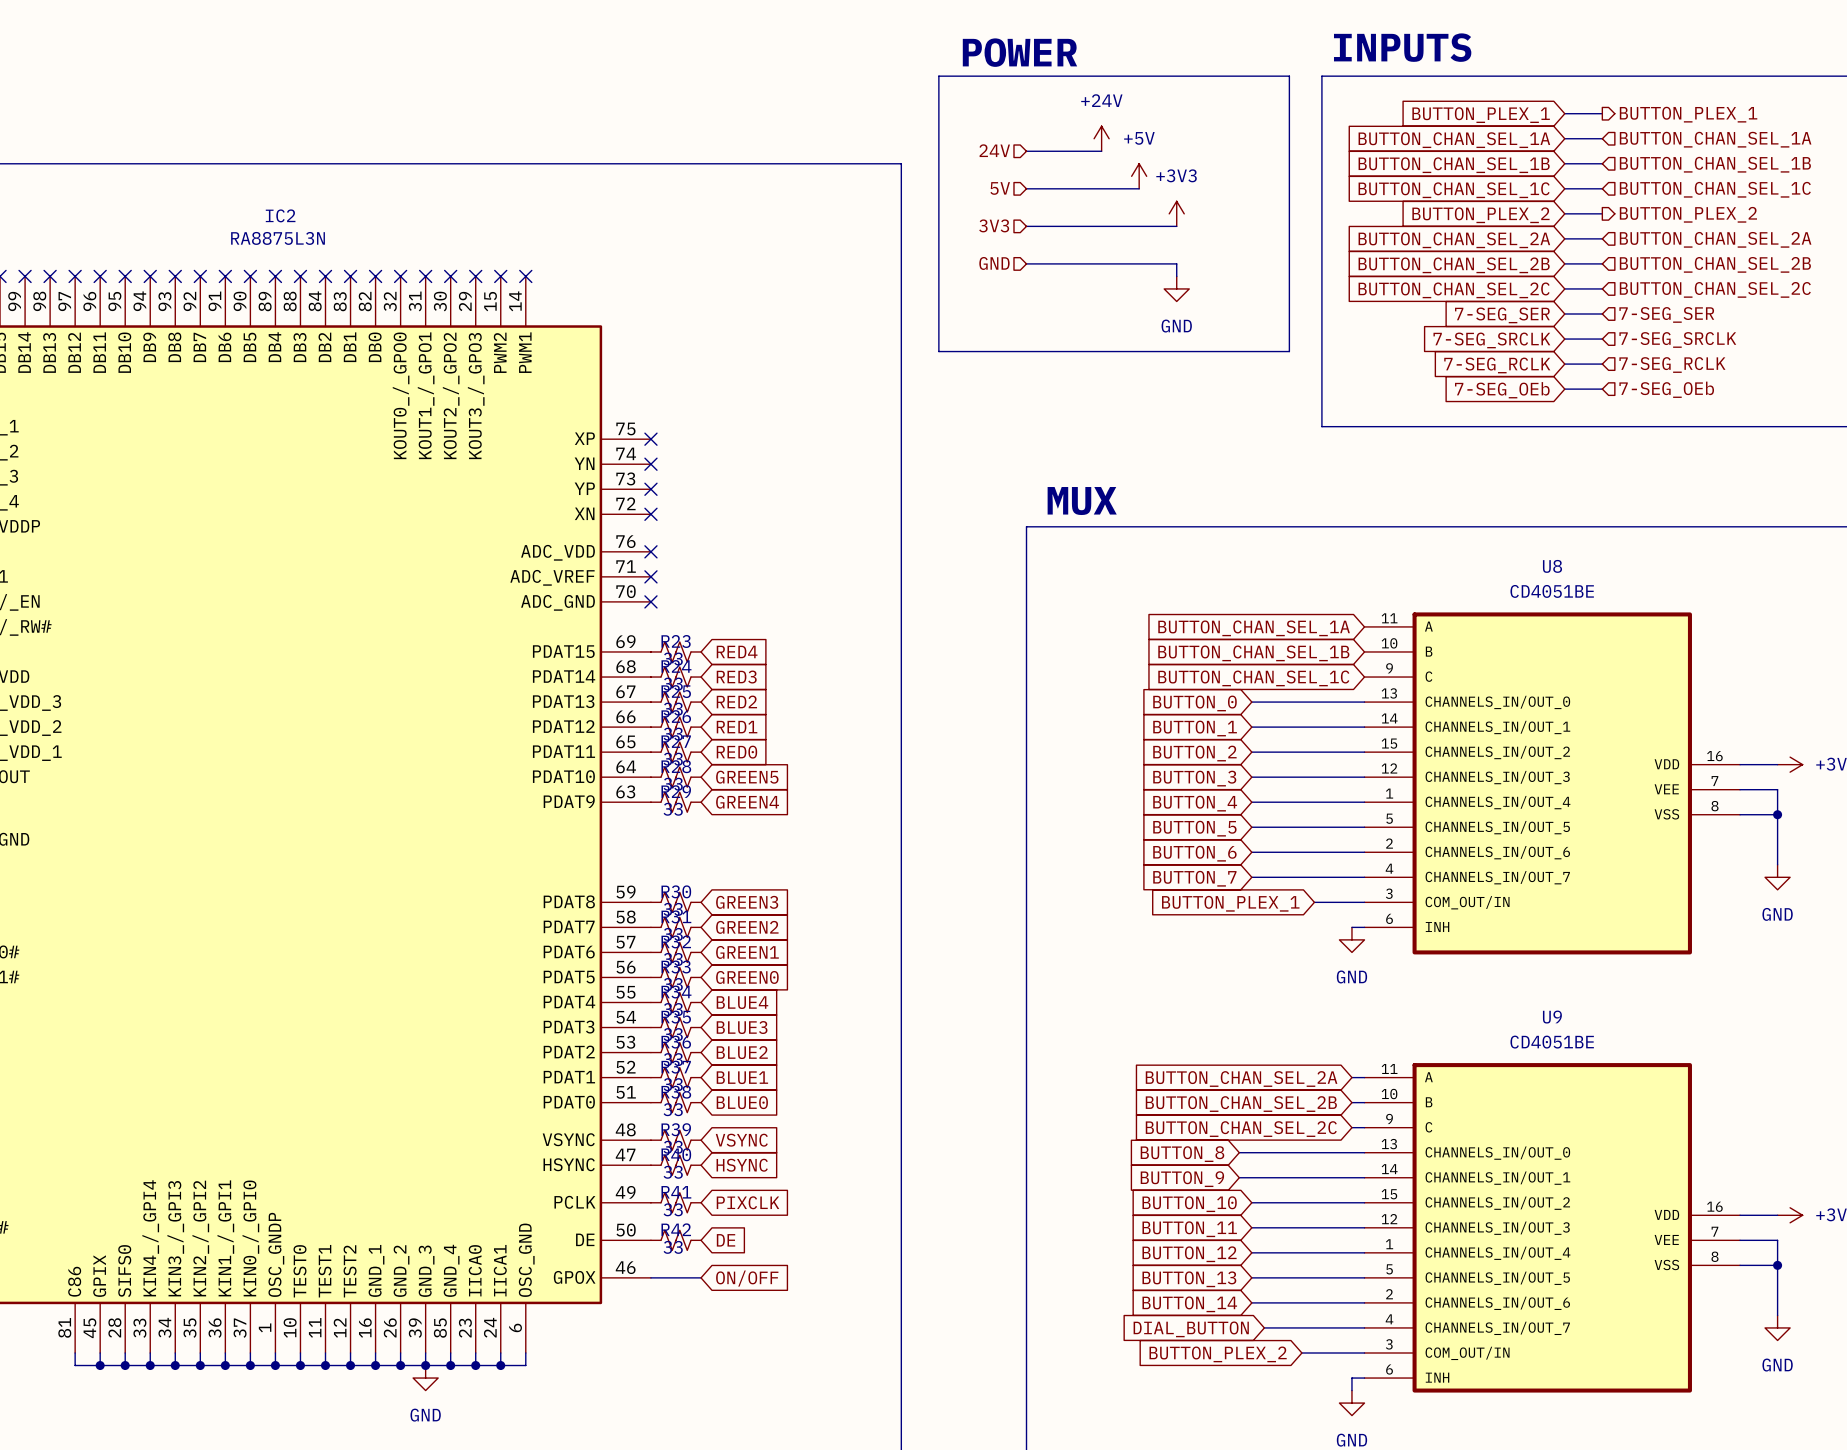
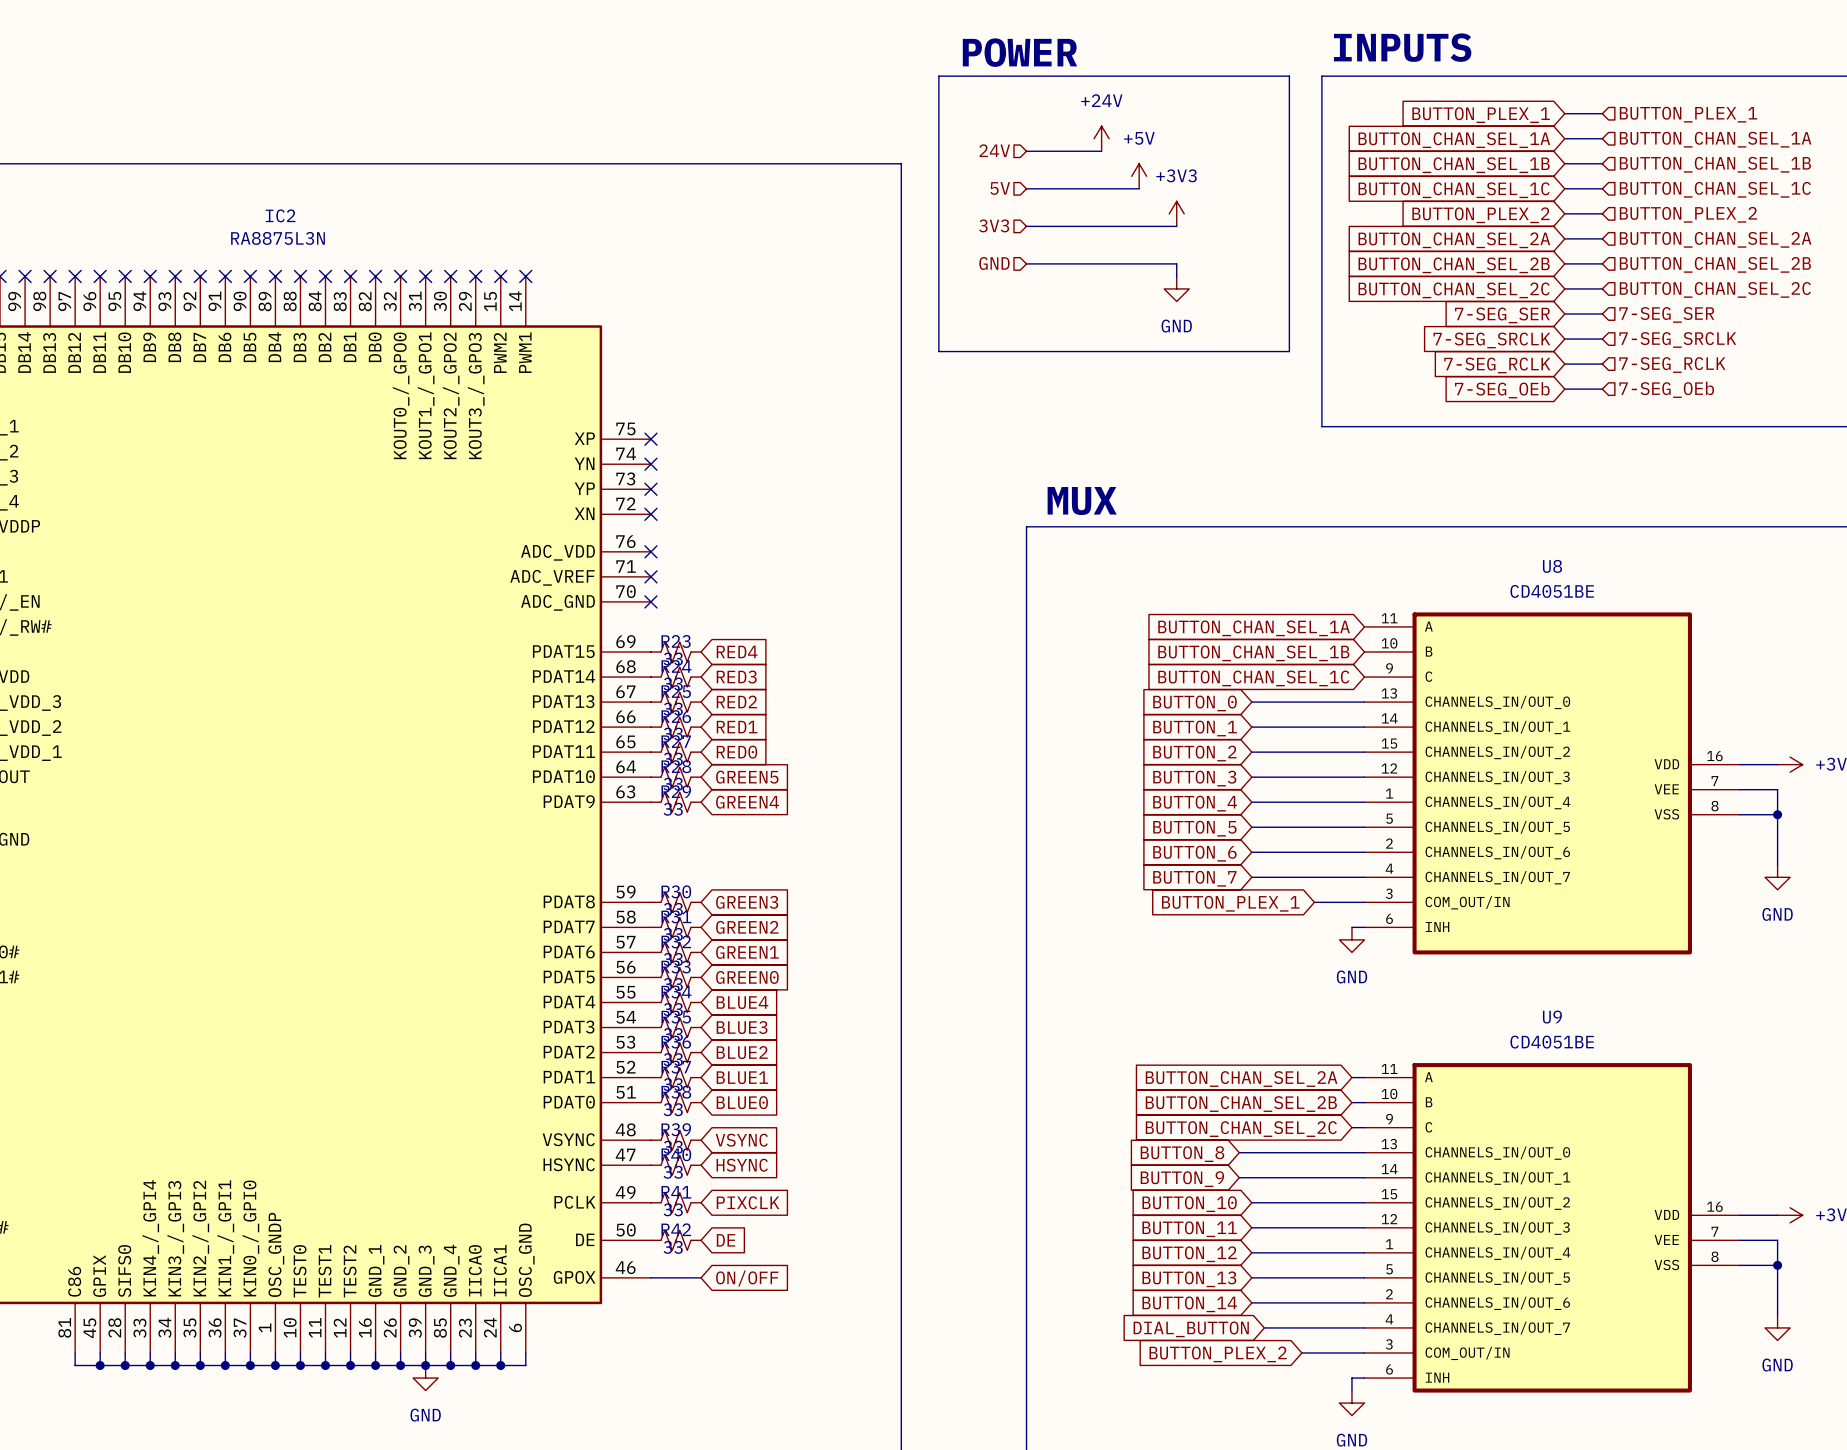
hierarchical label shape: output (1688, 114) -> input (1688, 114)
hierarchical label shape: output (1688, 214) -> input (1688, 214)

